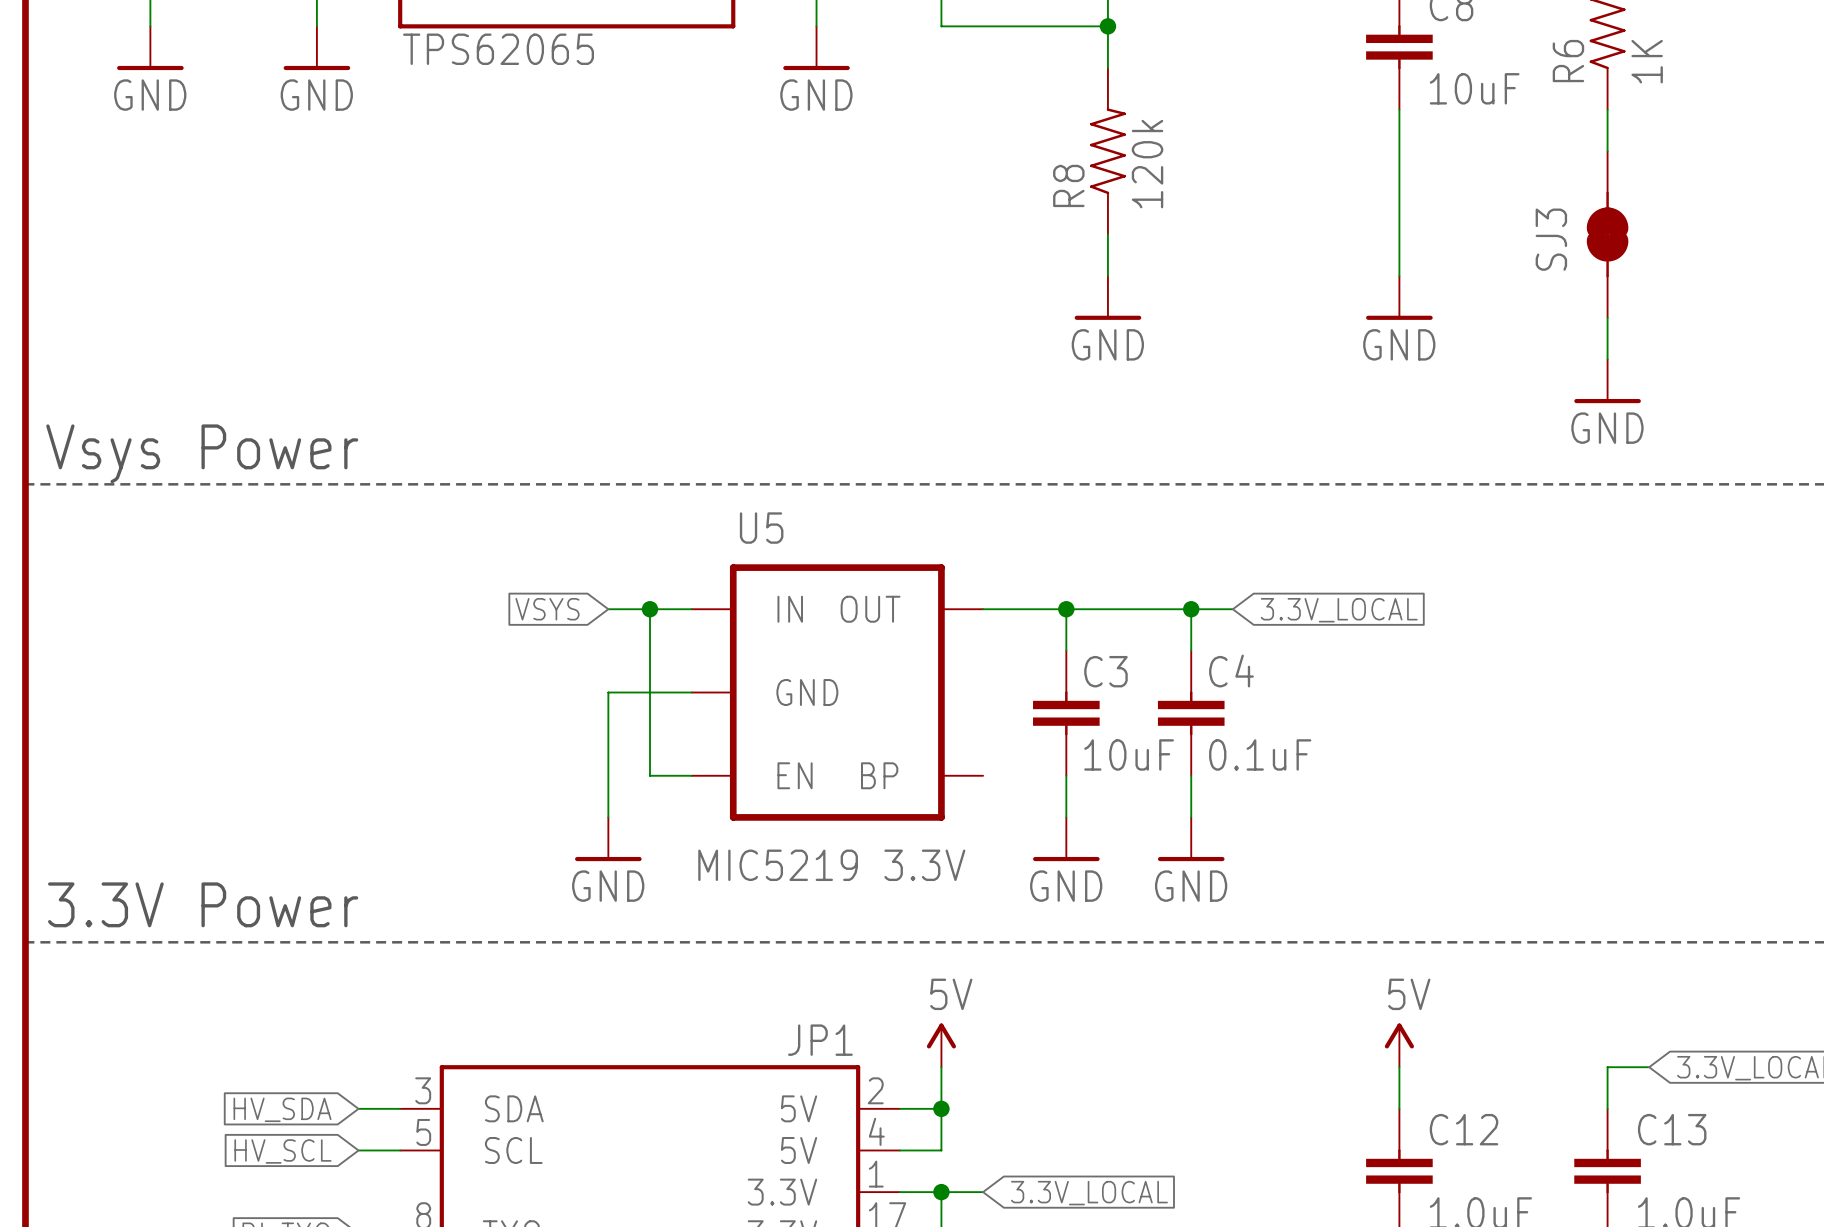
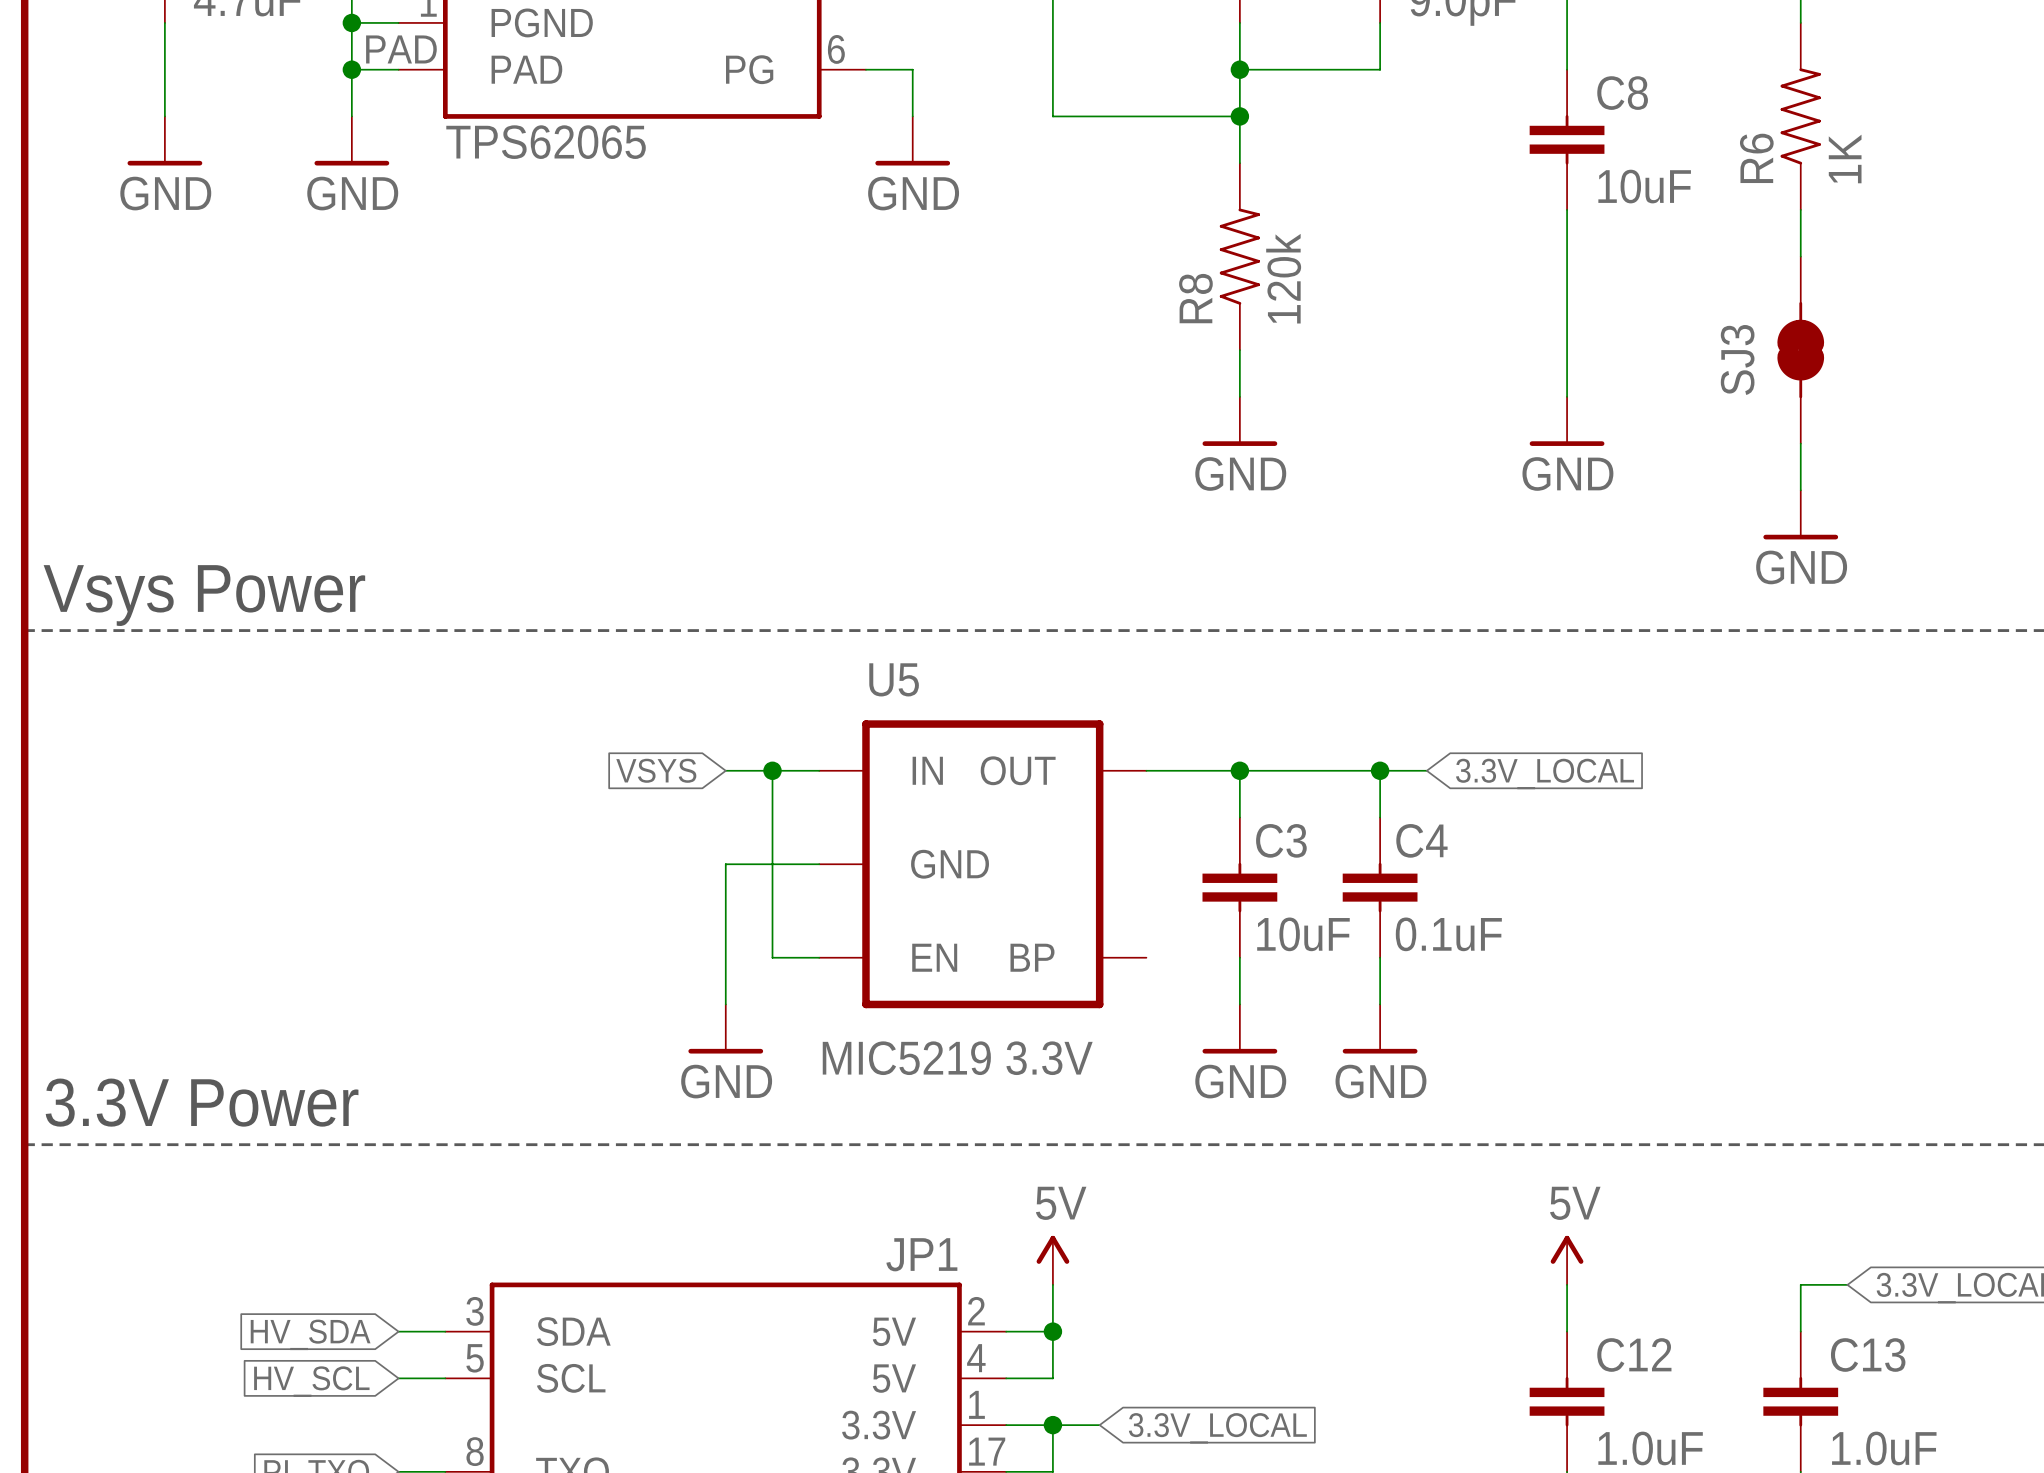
global label position: VSYS (547, 609) -> VSYS (656, 770)
wire: (608, 609) (649, 609) (649, 692) (608, 692) (608, 817) -> none
junction position: (649, 609) -> (772, 770)
wire: none -> (819, 770) (772, 770) (772, 957) (819, 957)
wire: (1066, 609) (1066, 650) -> (1239, 770) (1239, 817)
junction: (1066, 609) -> none
junction: none -> (1239, 770)
wire: (1191, 609) (1191, 650) -> none
junction: (1191, 609) -> none
junction: none -> (1380, 770)
wire: none -> (1426, 770) (1380, 770) (1380, 817)
global label position: 3.3V_LOCAL (1339, 610) -> 3.3V_LOCAL (1545, 773)
U5 position: (837, 692) -> (982, 864)
C3 position: (1066, 713) -> (1239, 887)
C4 position: (1191, 713) -> (1380, 887)
wire: (649, 775) (691, 775) -> (725, 957) (725, 1004)
wire: (1066, 775) (1066, 817) -> (1239, 957) (1239, 1004)
wire: (1191, 775) (1191, 817) -> (1380, 957) (1380, 1004)
power symbol position: GND (608, 839) -> GND (725, 1029)
power symbol: GND (1066, 839) -> none
power symbol: none -> GND (1239, 1029)
power symbol: GND (1191, 839) -> none
power symbol: none -> GND (1380, 1029)

